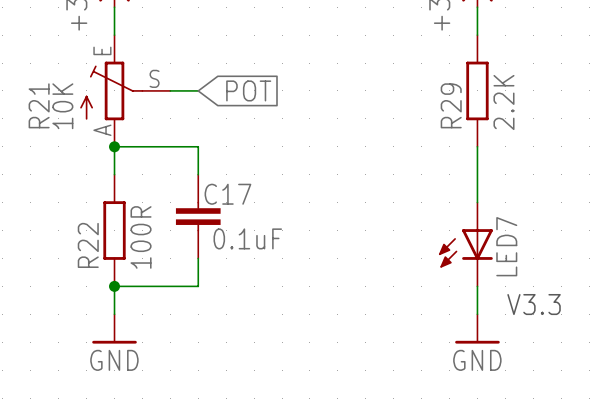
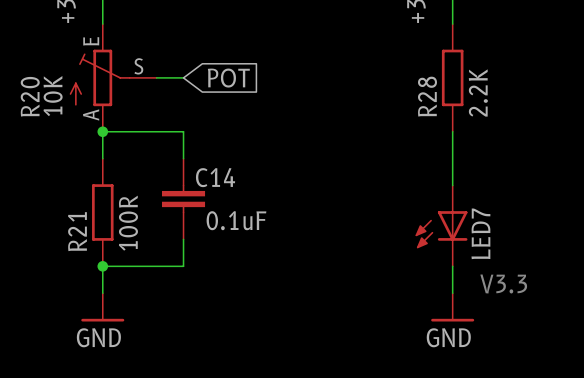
R21 name: R21 (39, 105) -> R20 (30, 96)
R29 name: R29 (451, 105) -> R28 (427, 96)
C17 name: C17 (227, 194) -> C14 (215, 177)
R22 name: R22 (88, 245) -> R21 (77, 231)

